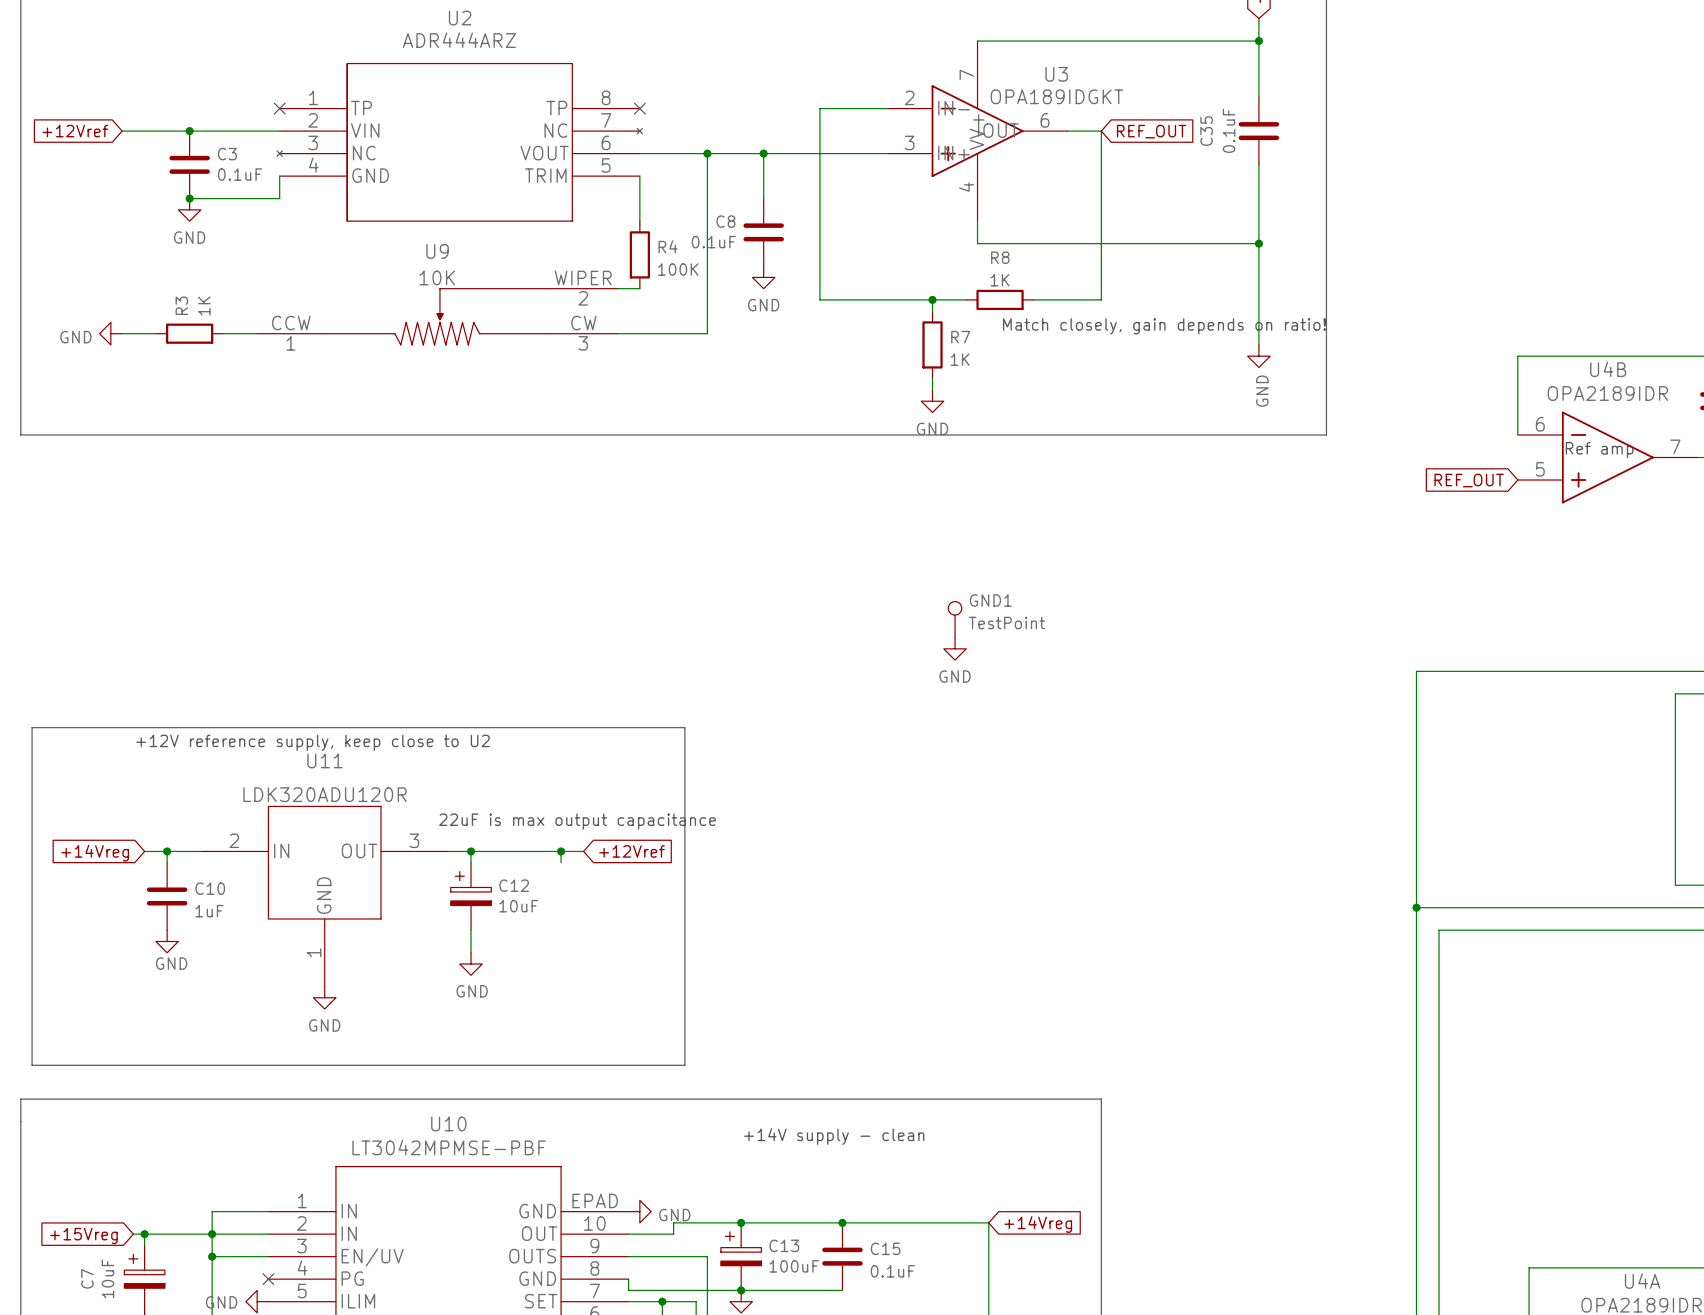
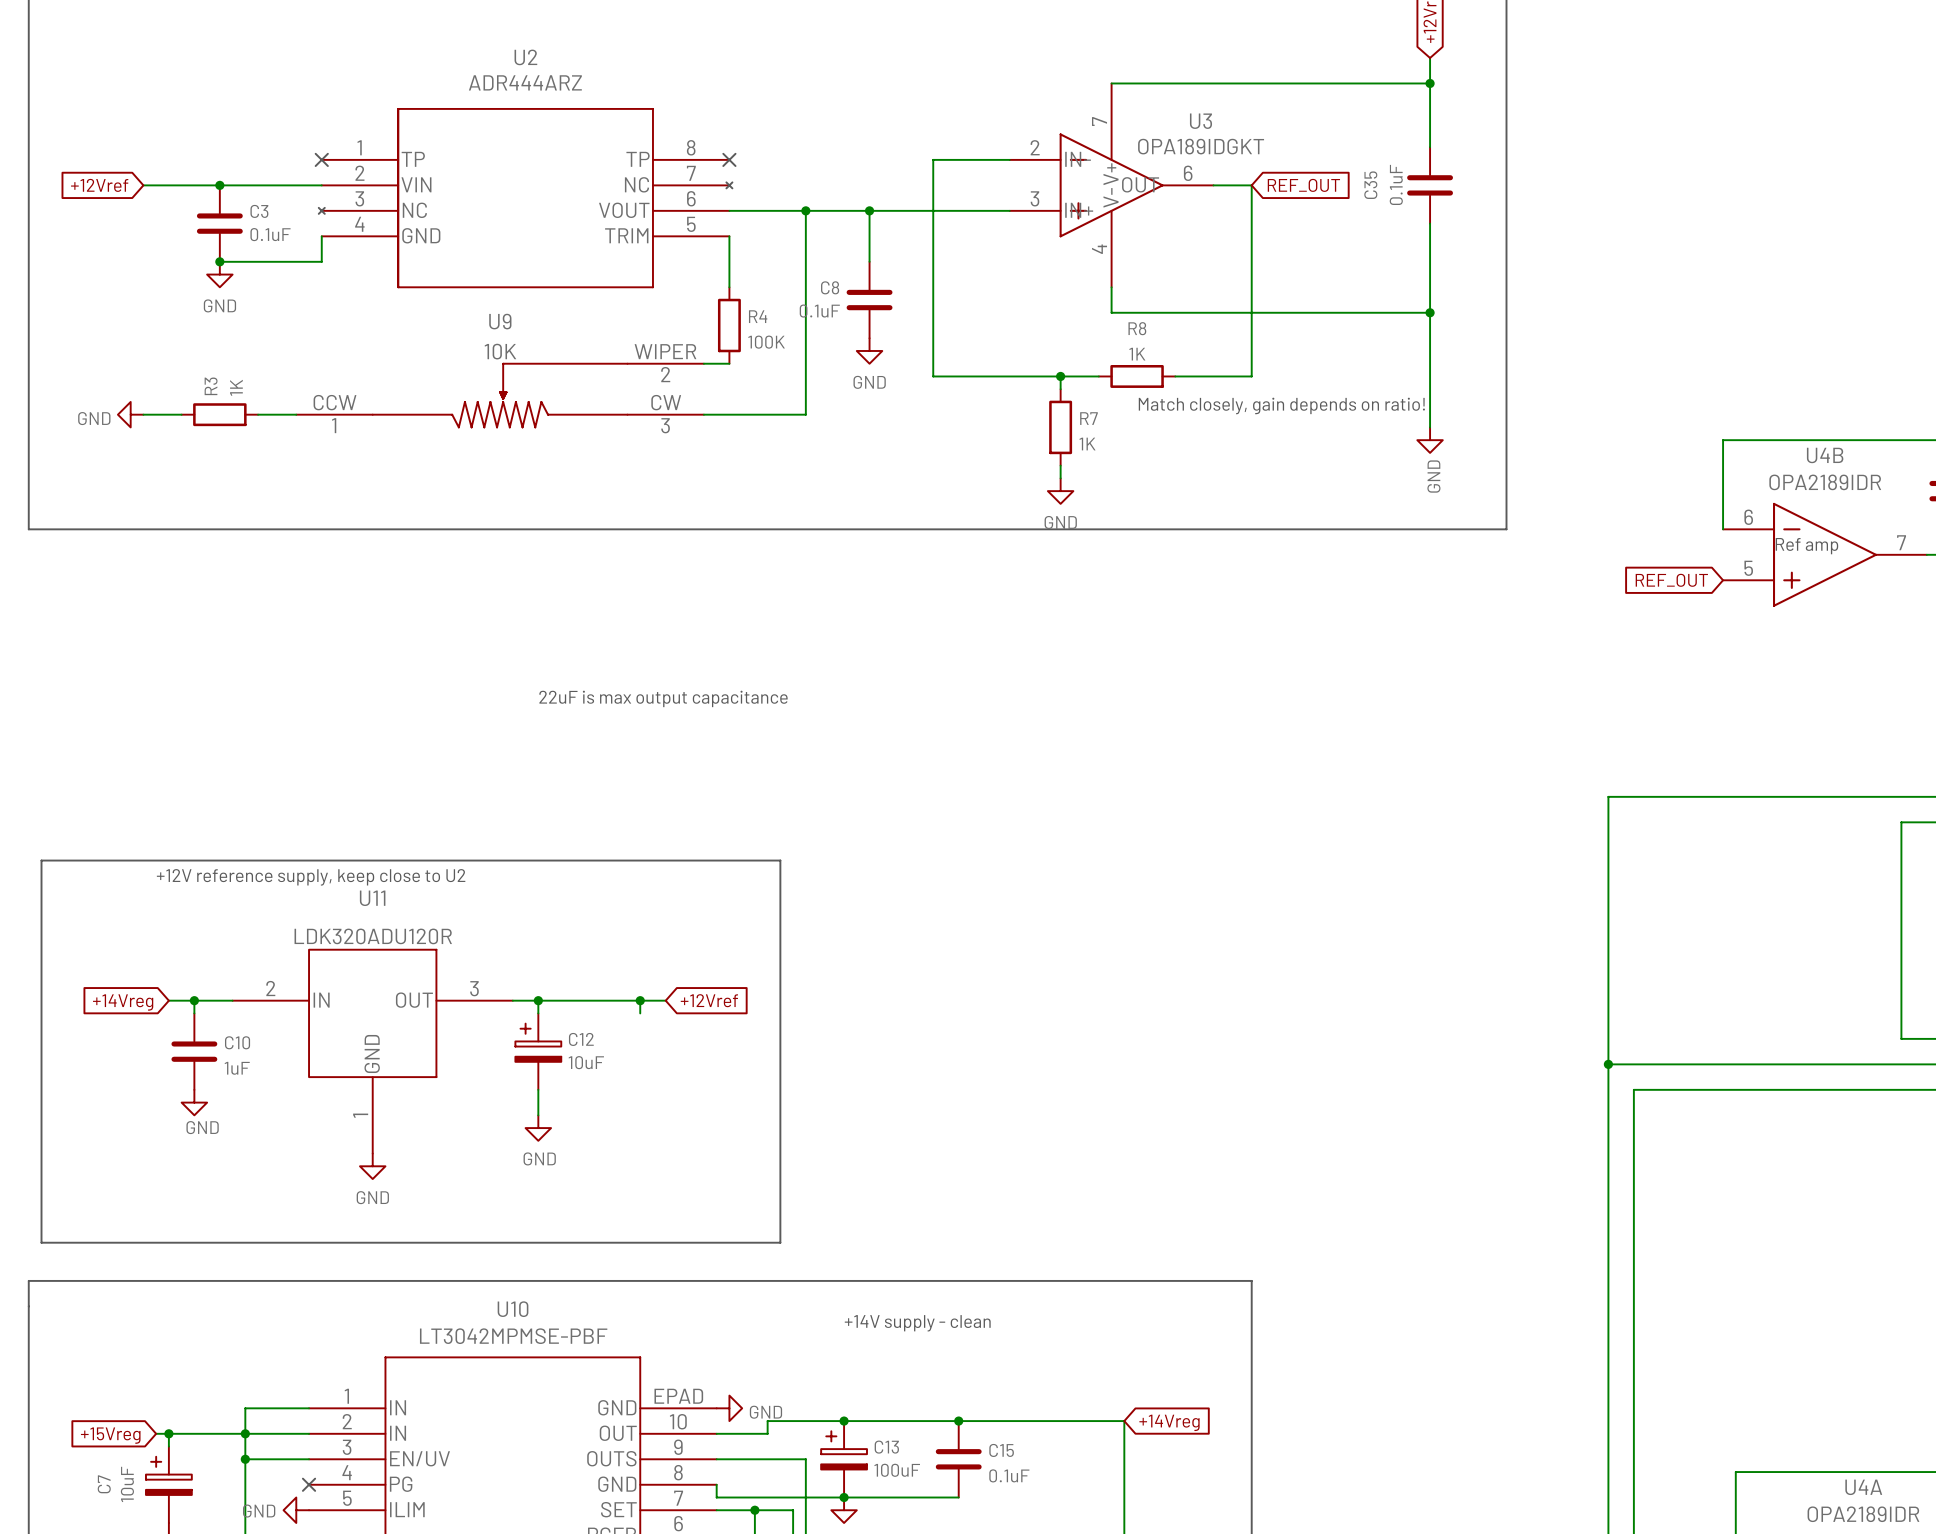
text: none -> 22uF is max output capacitance (663, 698)
GND1: TestPoint (955, 619) -> none
power symbol: GND (955, 648) -> none
text: 22uF is max output capacitance (577, 821) -> none

